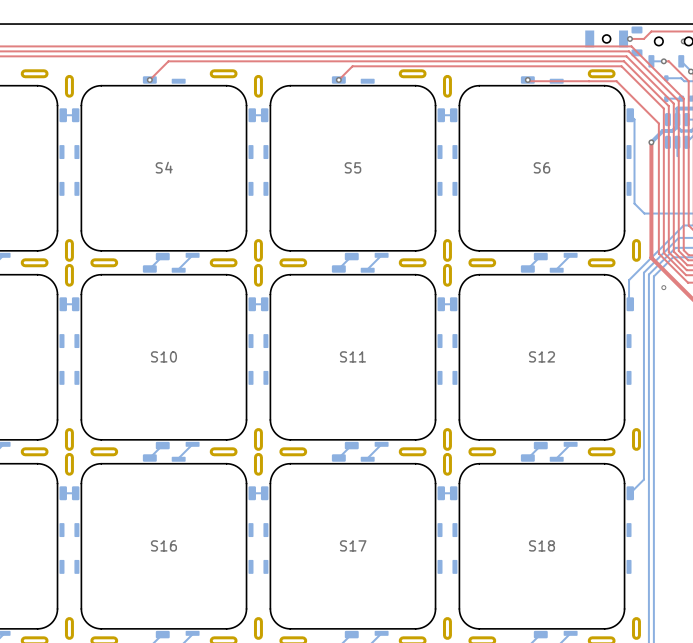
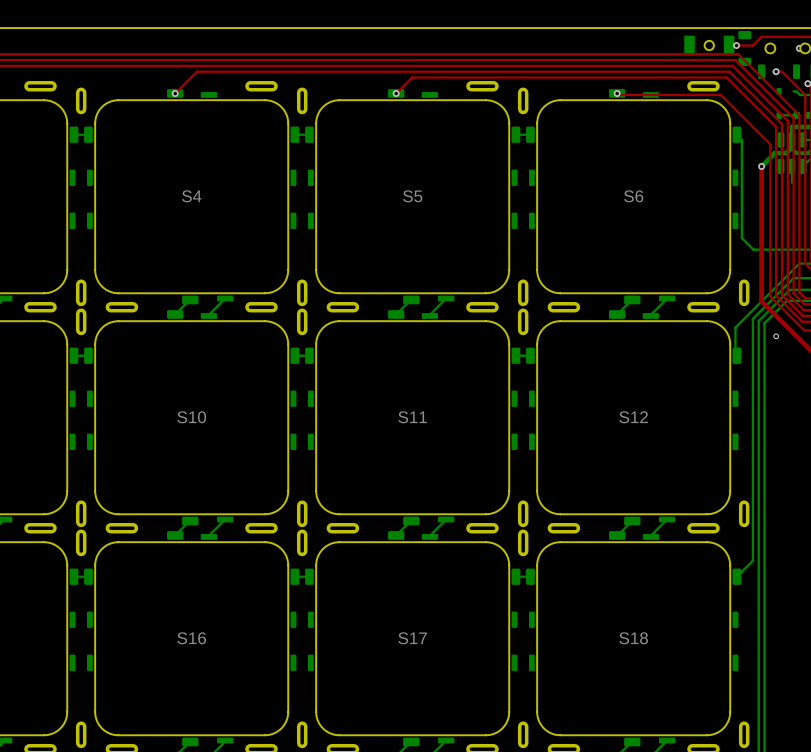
bottom track: (651, 61) (661, 61) -> none
bottom track: (681, 61) (691, 71) -> none
bottom track: (666, 78) (678, 78) -> none

